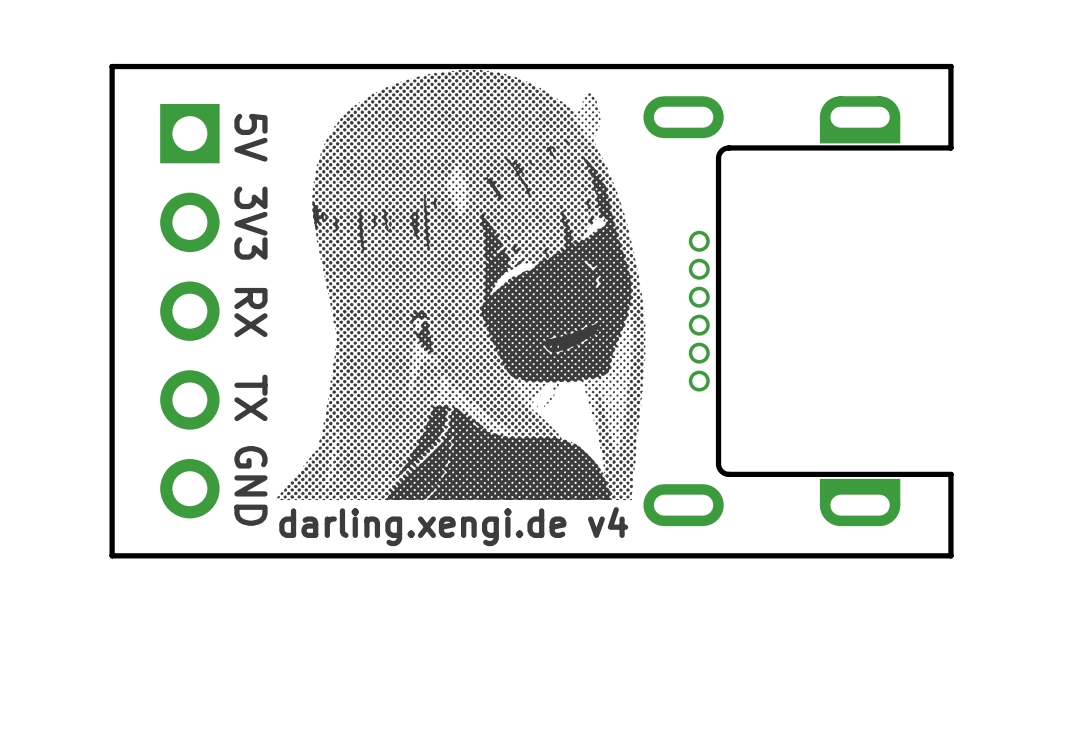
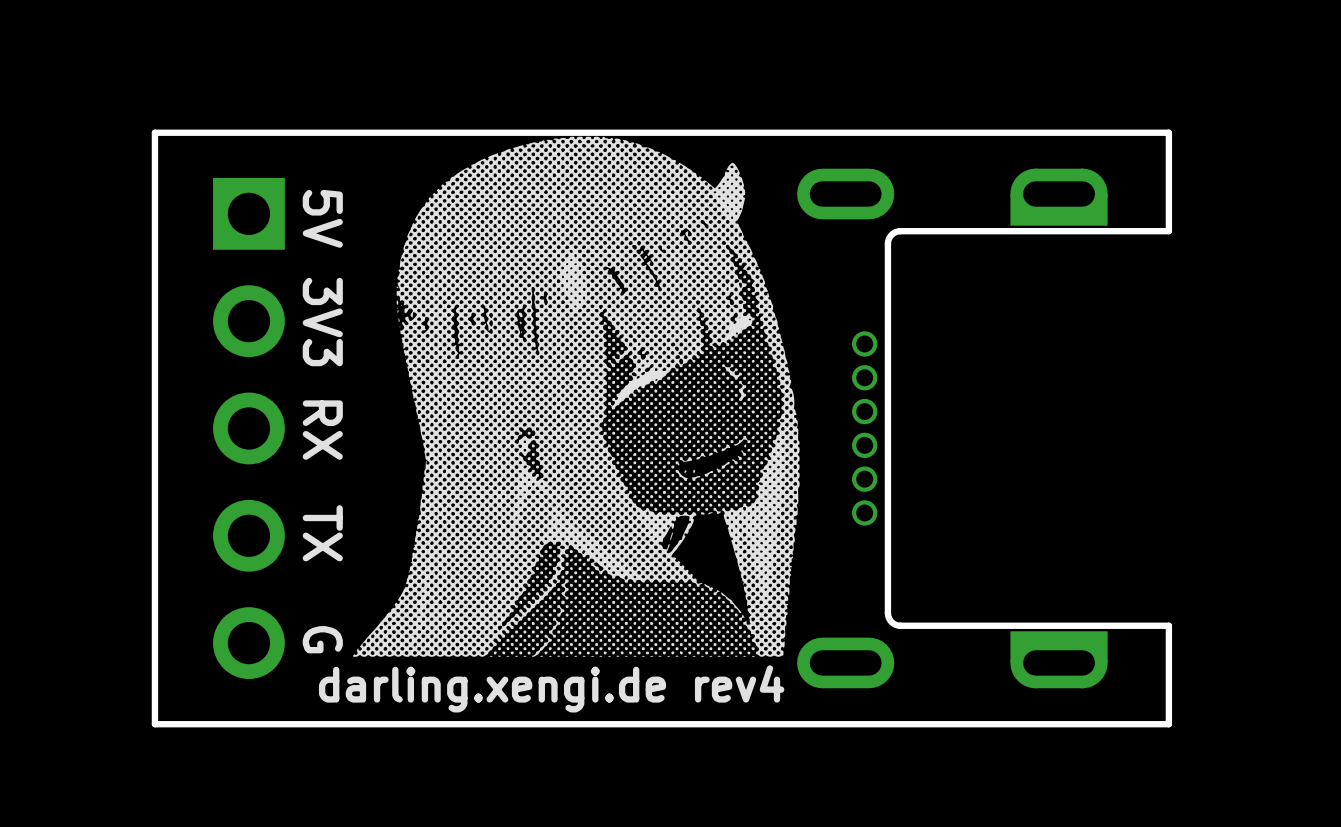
drawing shape: [276, 69, 646, 501] -> [353, 136, 800, 657]
text: GND (250, 485) -> G (322, 639)
text: darling.xengi.de v4 (453, 526) -> darling.xengi.de rev4 (551, 688)

